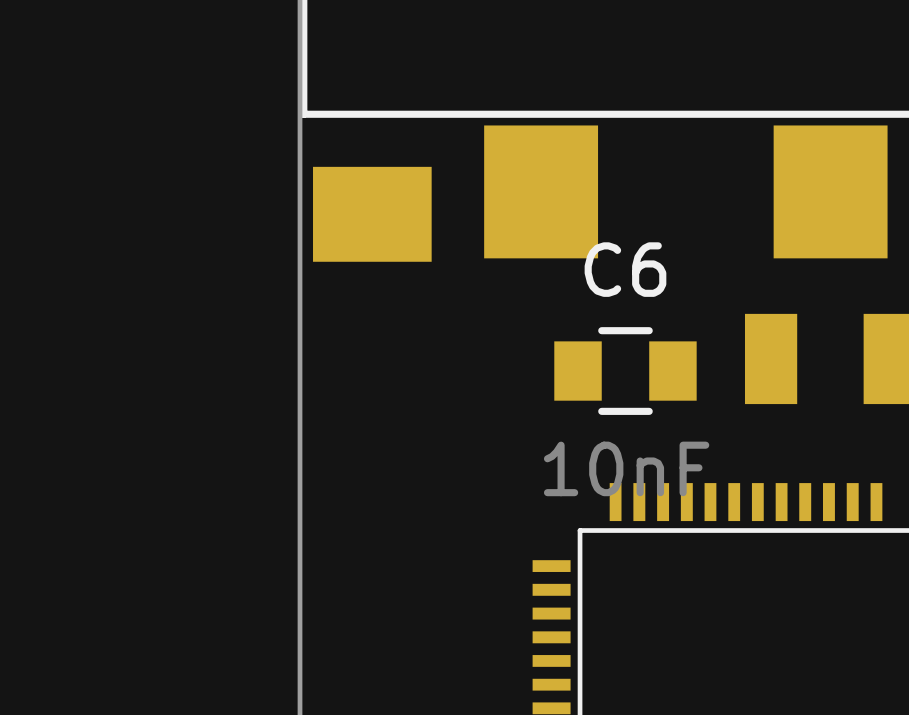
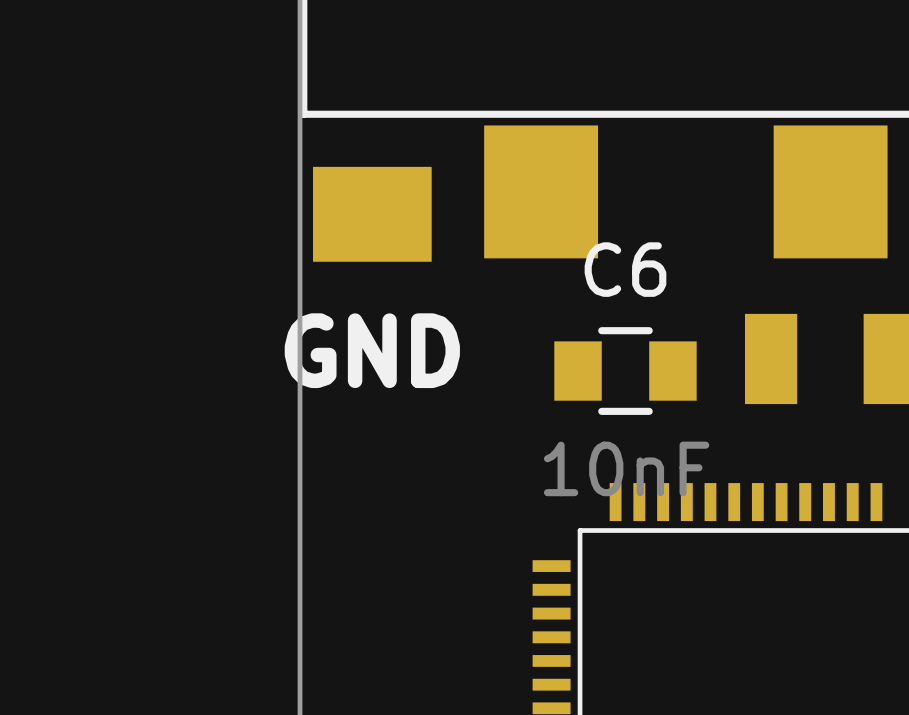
part value: none -> GND (372, 350)

